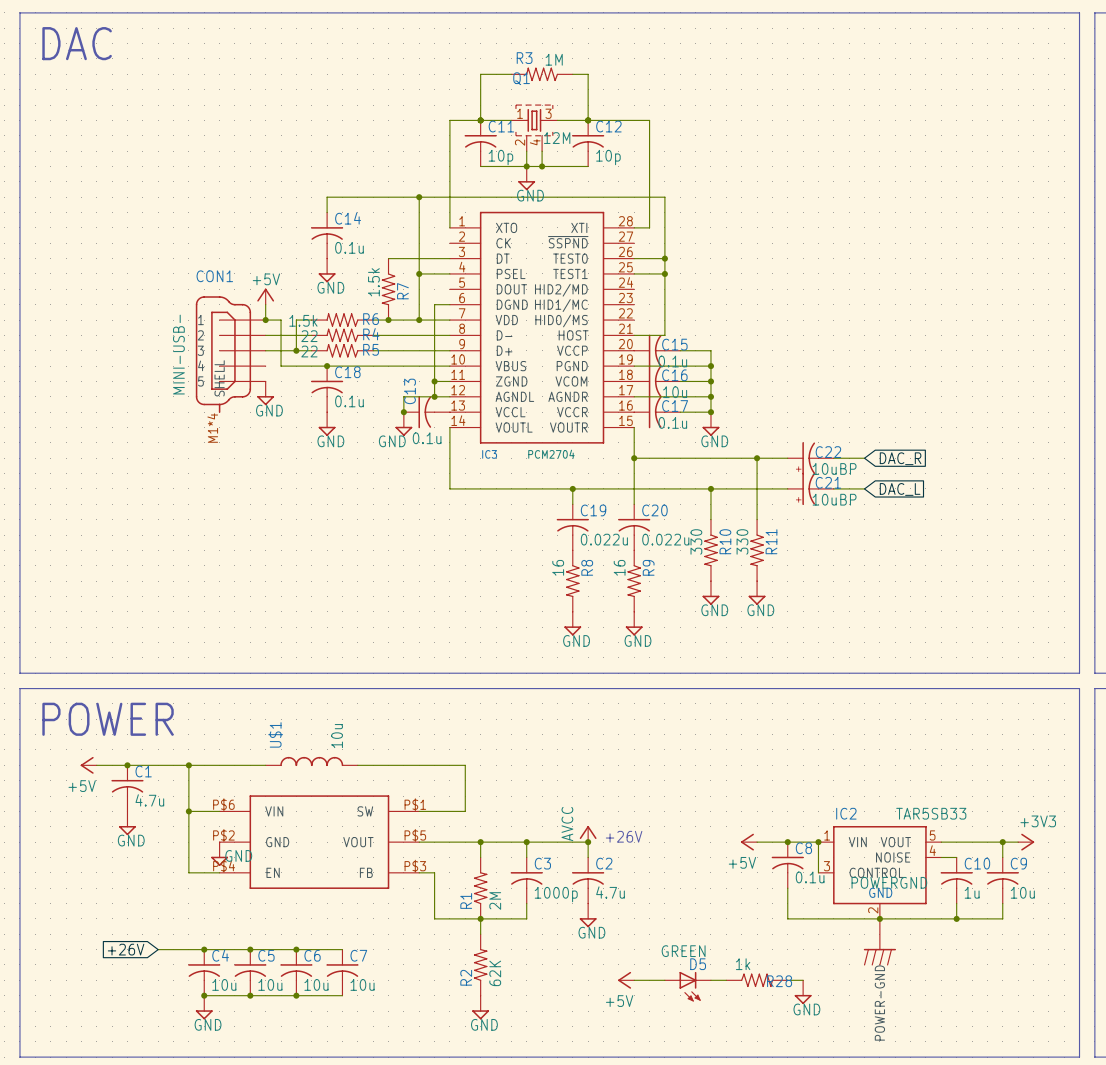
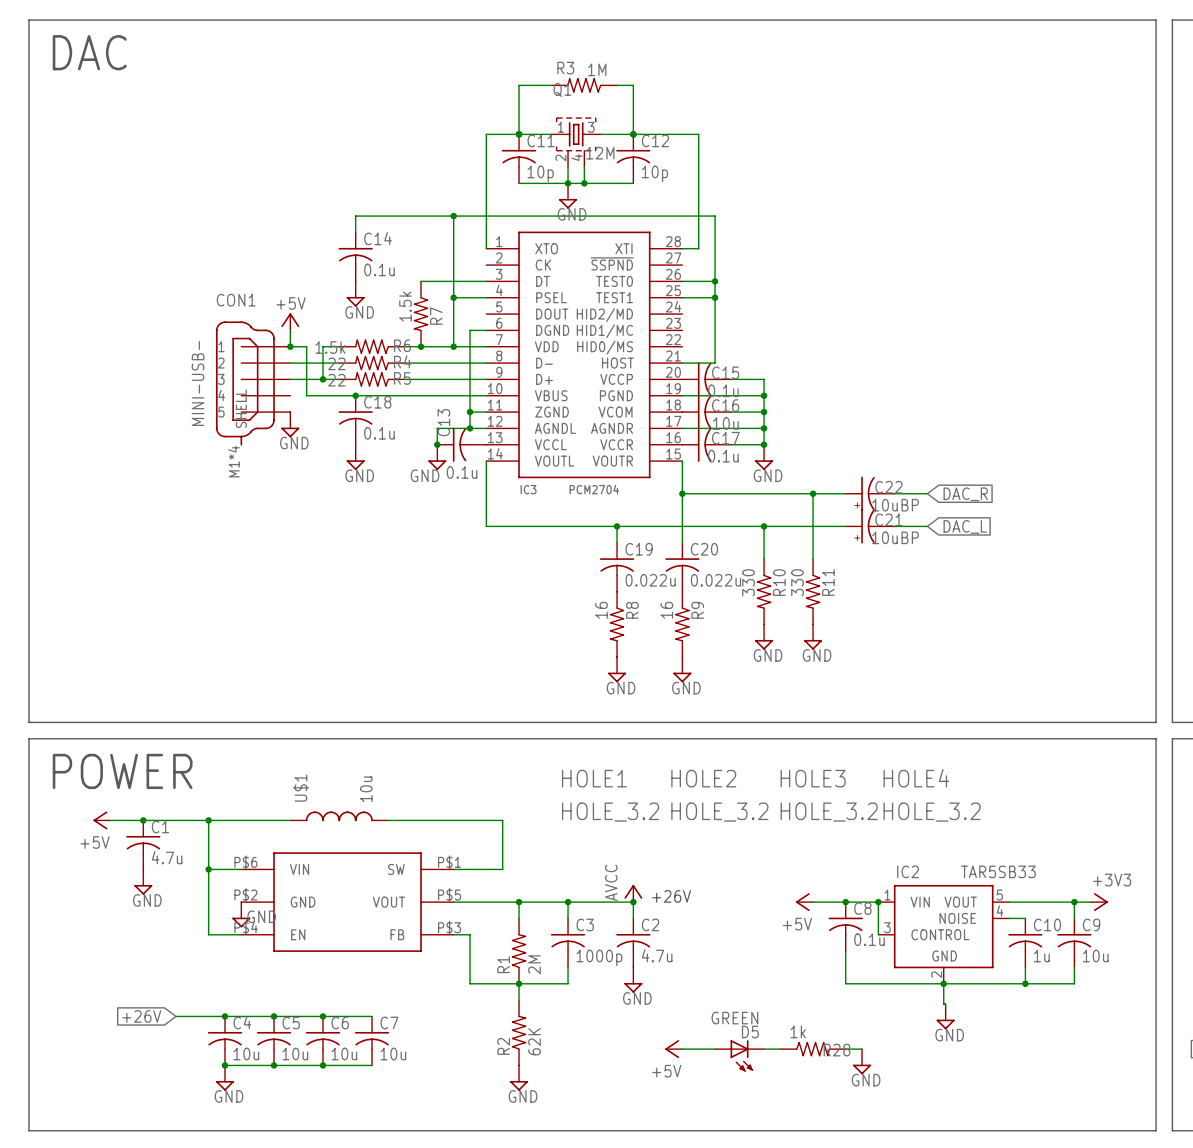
HOLE4: none -> HOLE_3.2 (932, 795)
HOLE1: none -> HOLE_3.2 (610, 795)
HOLE2: none -> HOLE_3.2 (719, 795)
HOLE3: none -> HOLE_3.2 (829, 795)
power symbol: POWERGND (879, 942) -> none
power symbol: none -> GND (945, 1016)

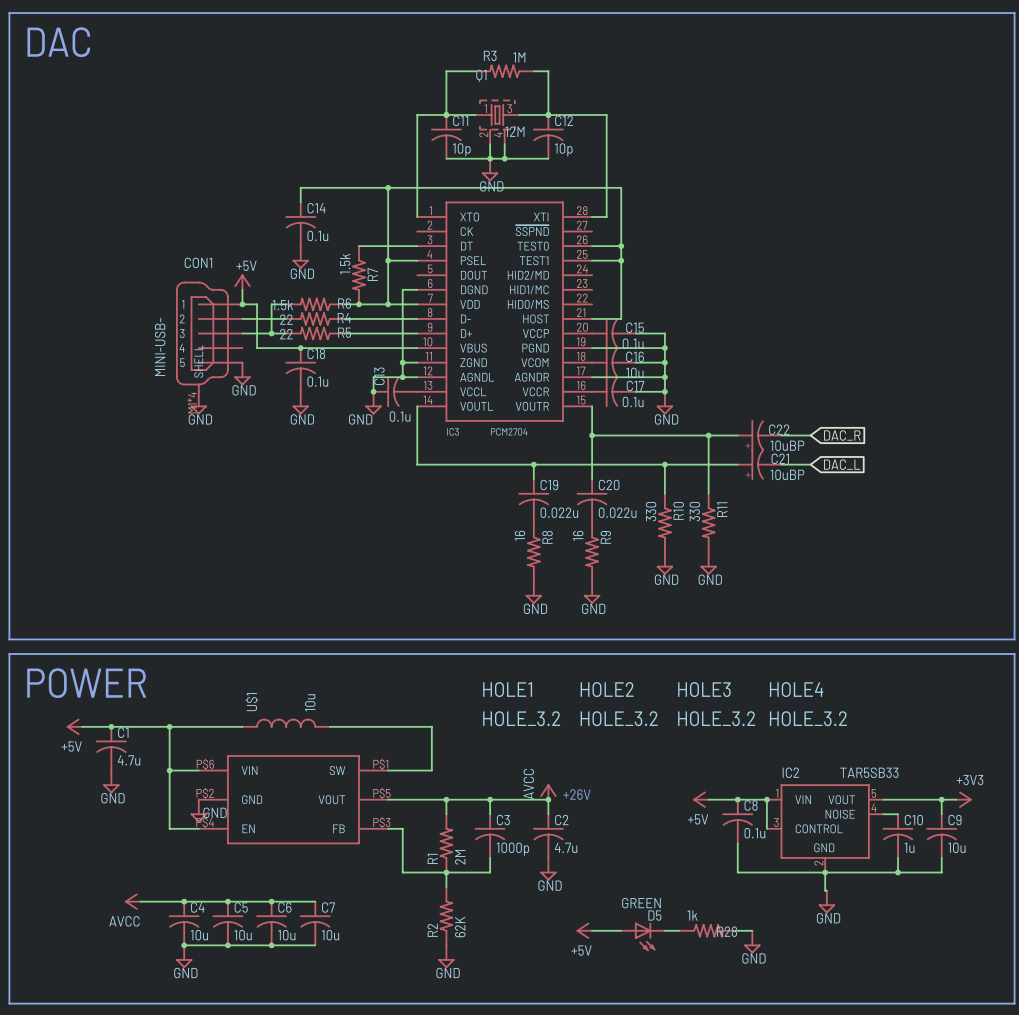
power symbol: none -> GND (198, 403)
global label: +26V (141, 1016) -> none
power symbol: none -> AVCC (132, 901)

